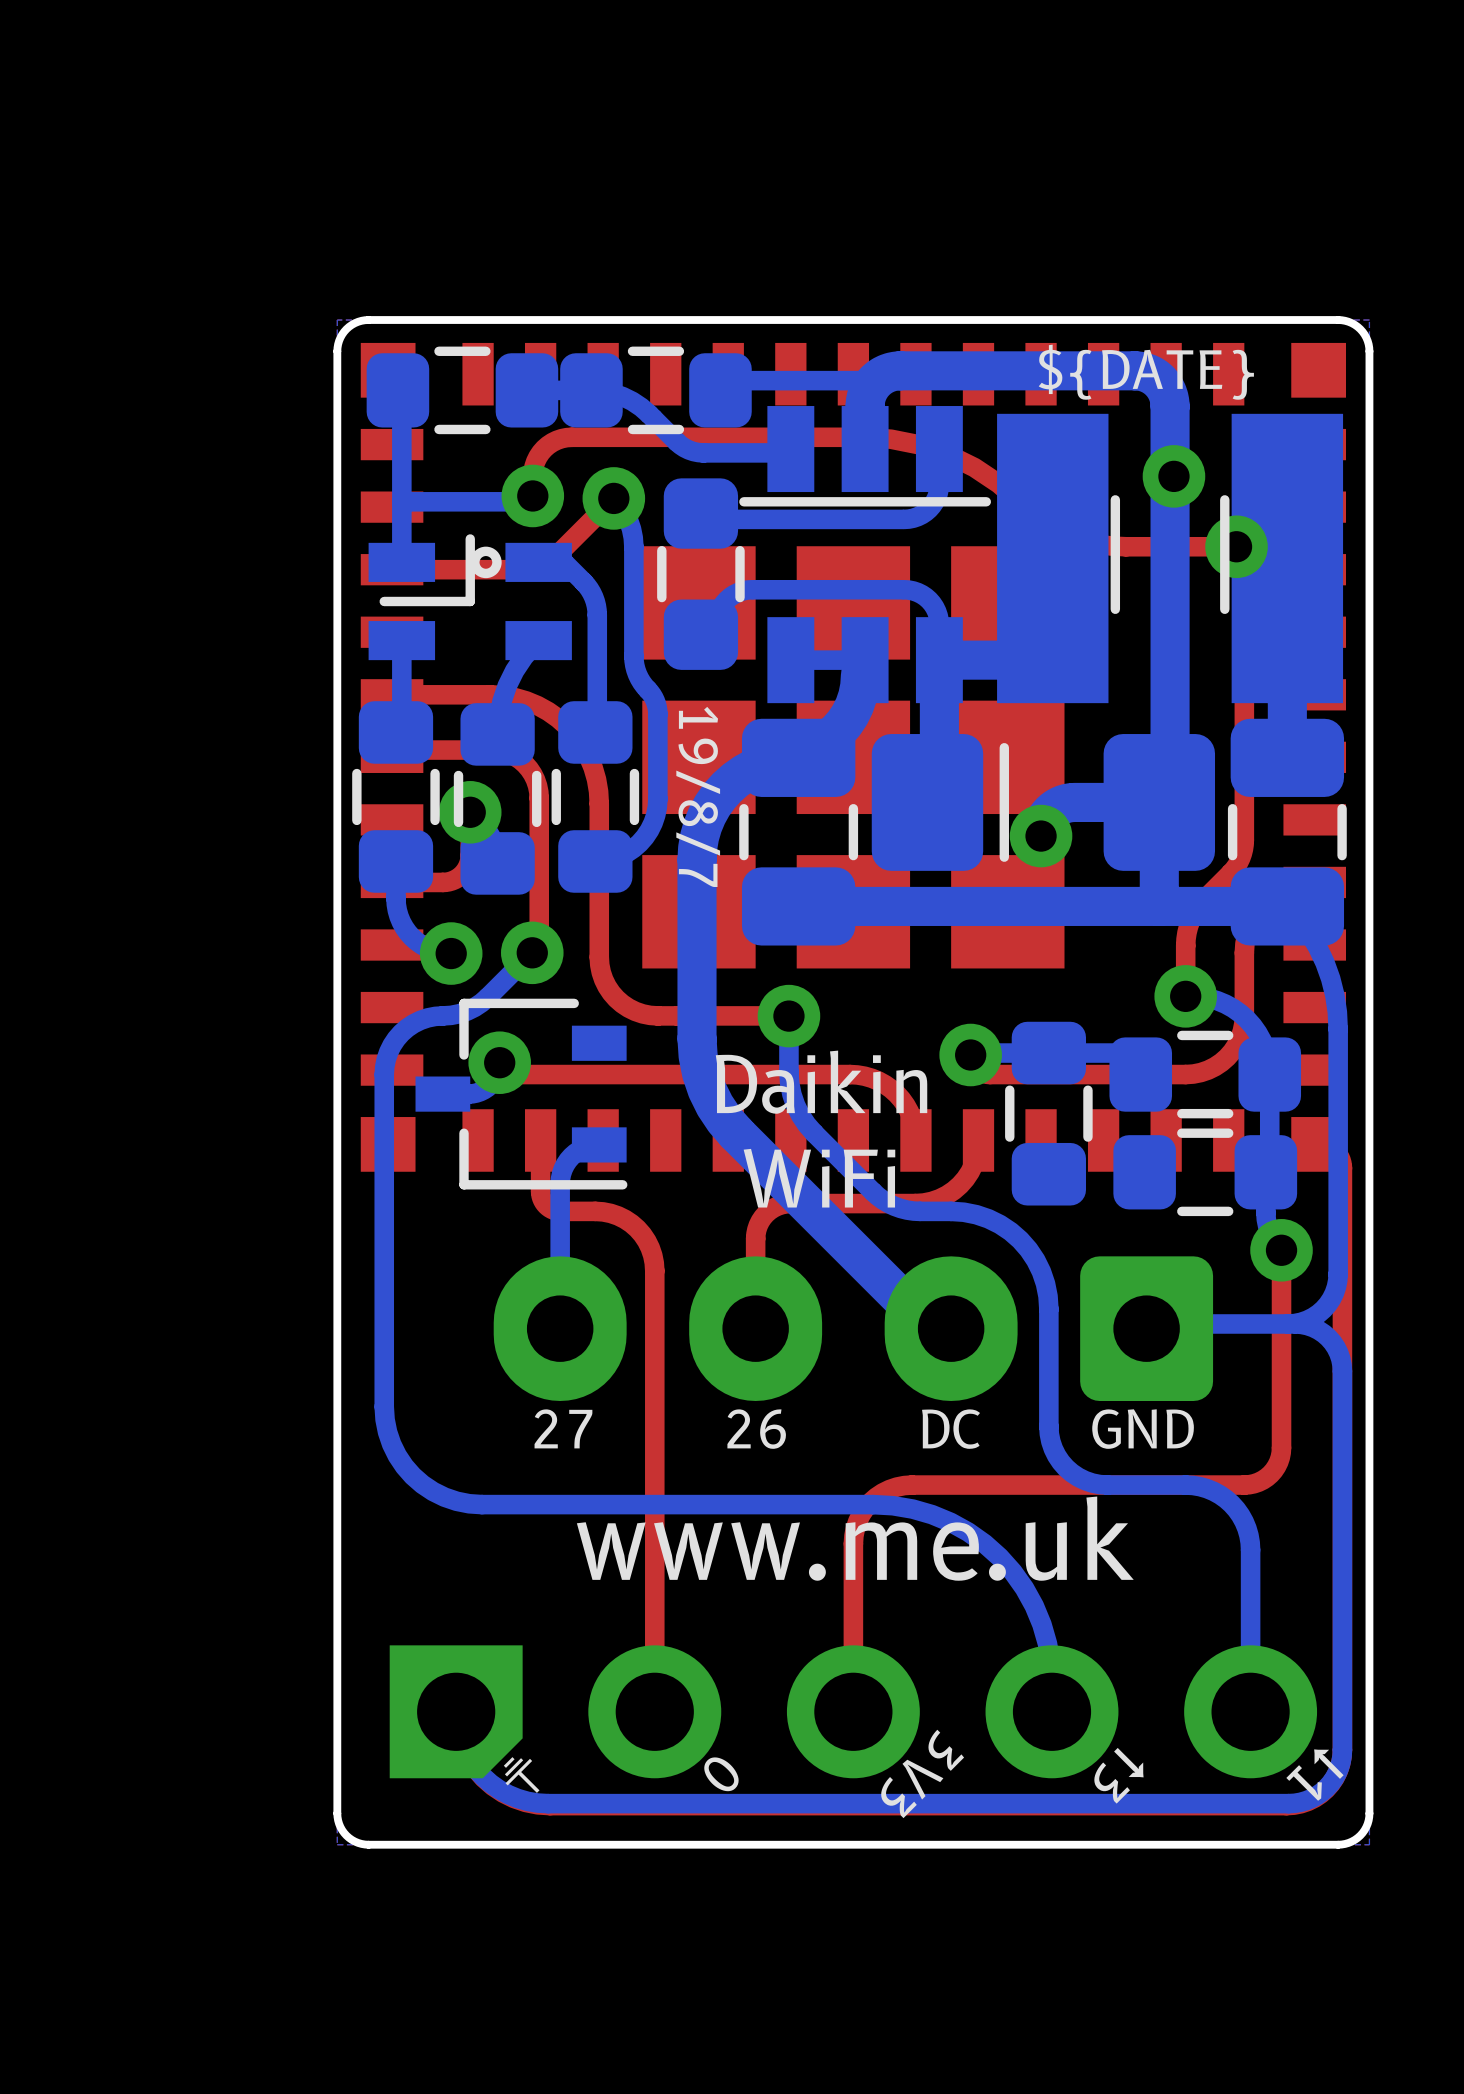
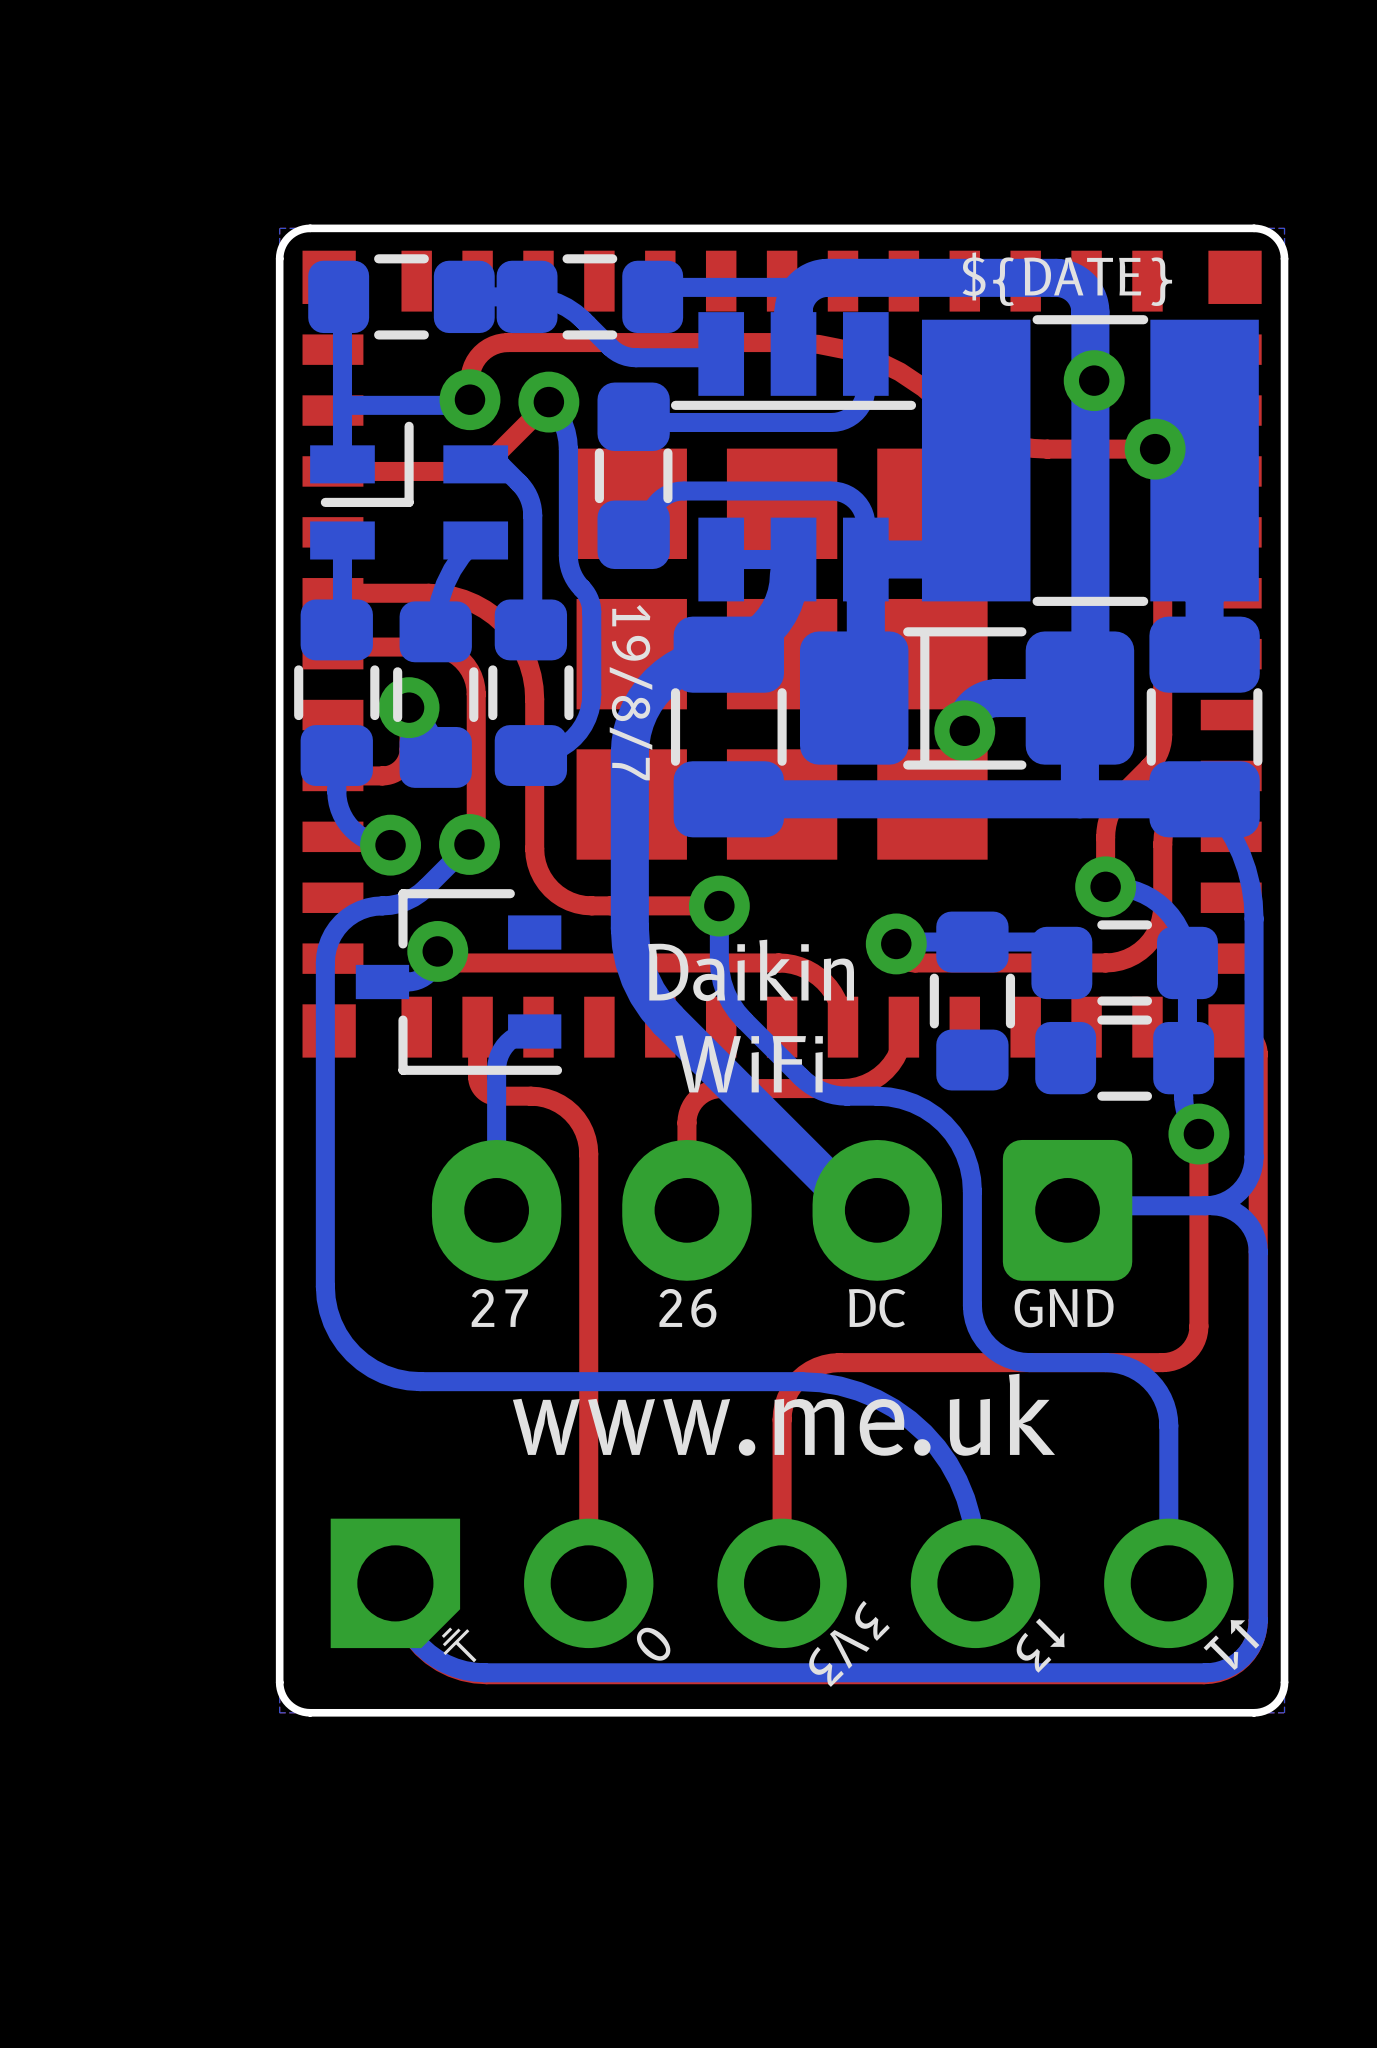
part footprint: [663, 351, 1345, 946] -> [594, 258, 1263, 838]
drawing: [1110, 495, 1230, 615] -> none
part footprint: [368, 534, 572, 661] -> [310, 421, 509, 560]
drawing: [657, 545, 745, 603] -> none
drawing: [999, 743, 1009, 862] -> none
drawing: [739, 804, 859, 861] -> none
drawing: [1227, 804, 1347, 861] -> none

